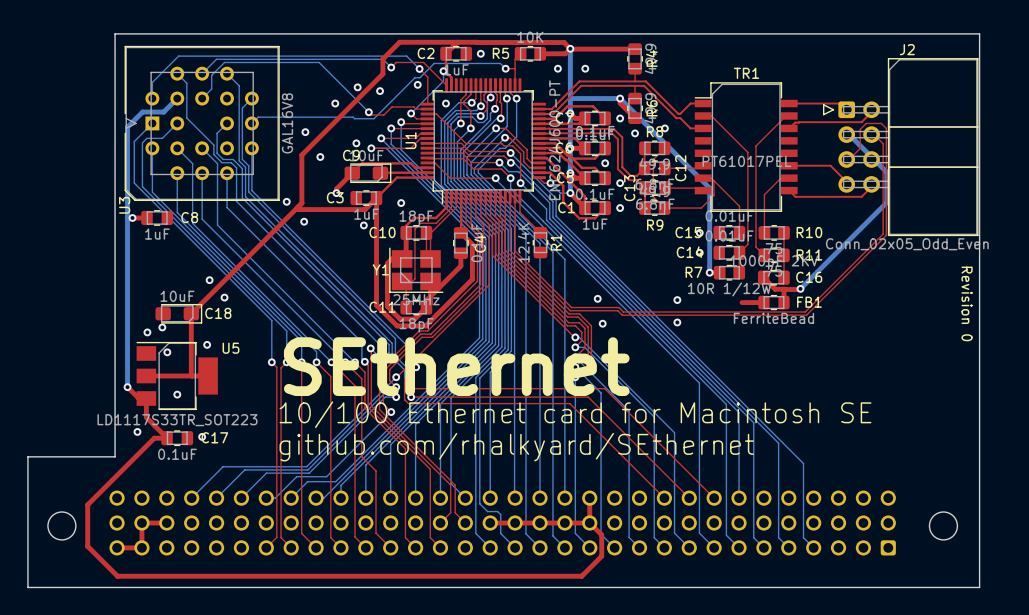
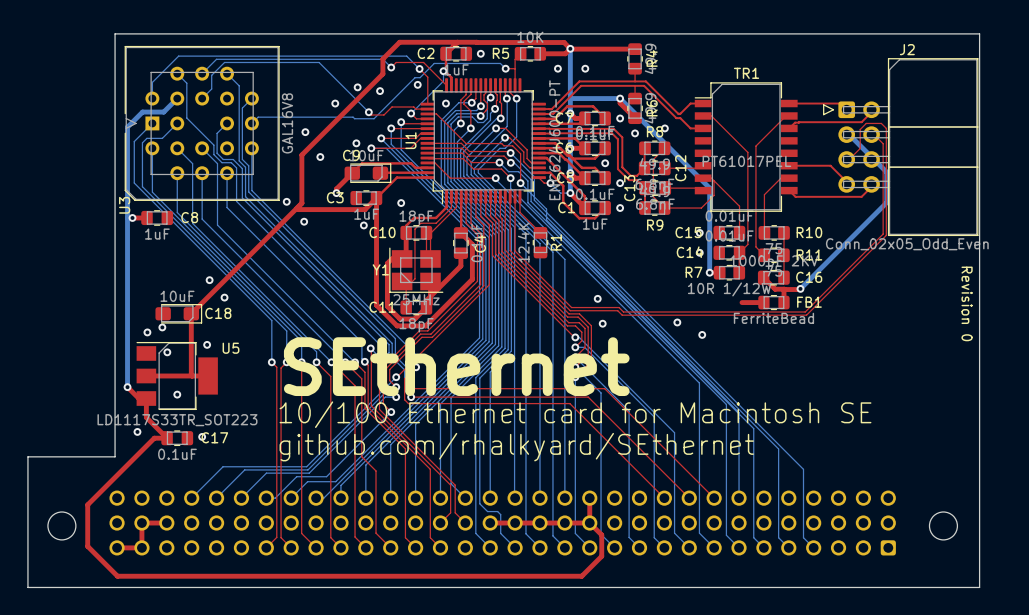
bottom track: (534, 176) (556, 198) (556, 216) (803, 463) (803, 469) -> (534, 176) (534, 200) (803, 469)
bottom track: (531, 179) (552, 201) (552, 217) (778, 443) (778, 449) -> (531, 179) (531, 201) (778, 449)
bottom track: (527, 180) (549, 202) (549, 218) (753, 422) (753, 428) -> (527, 180) (527, 202) (753, 428)
via position: (677, 300) -> (702, 334)

